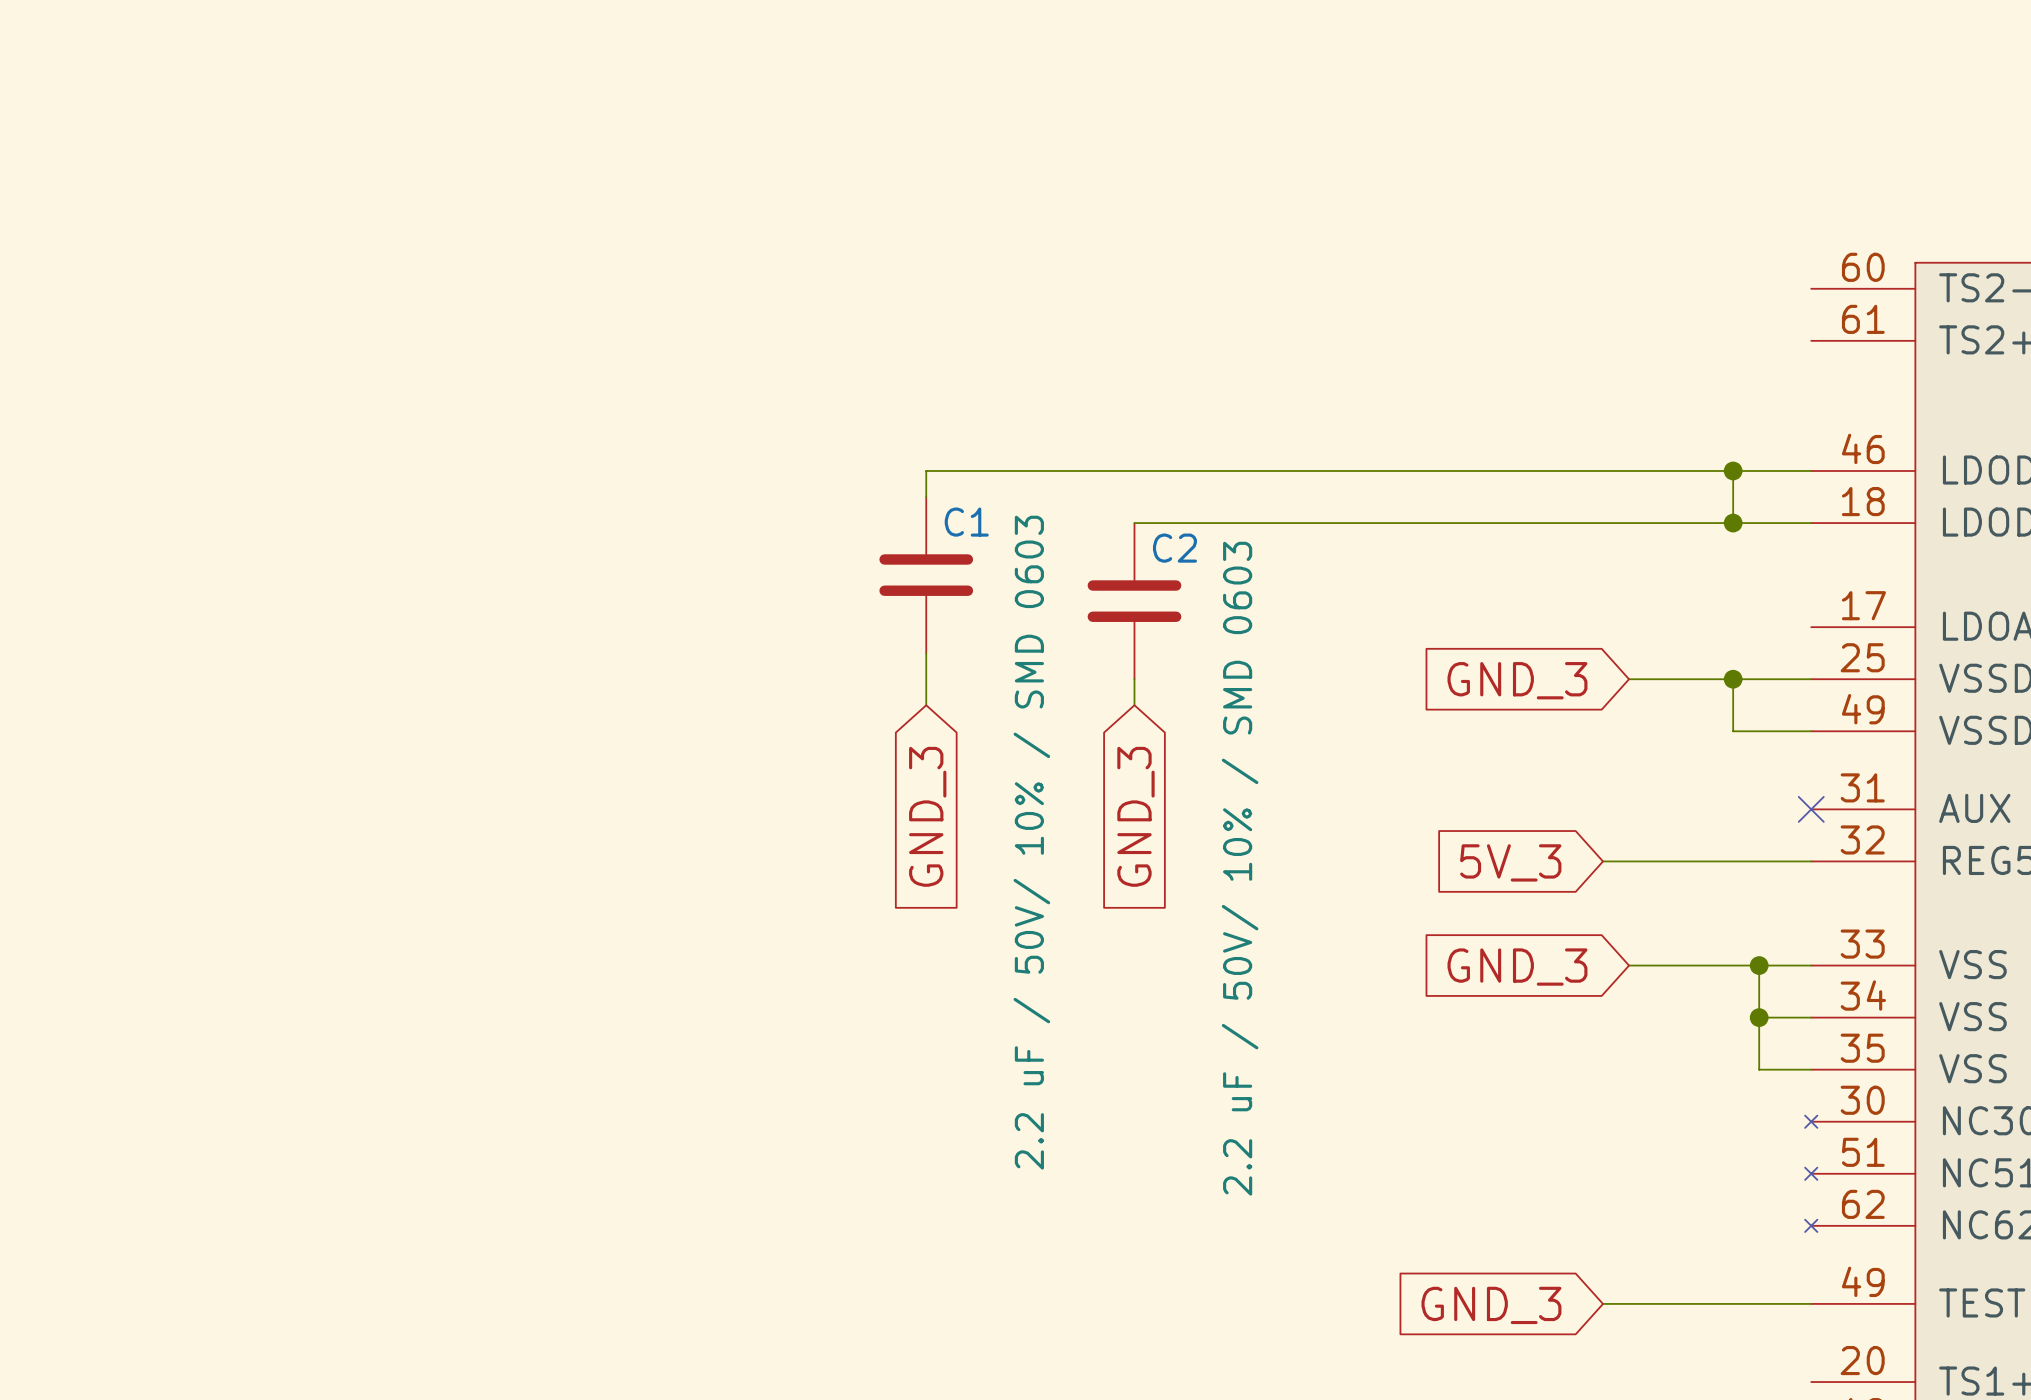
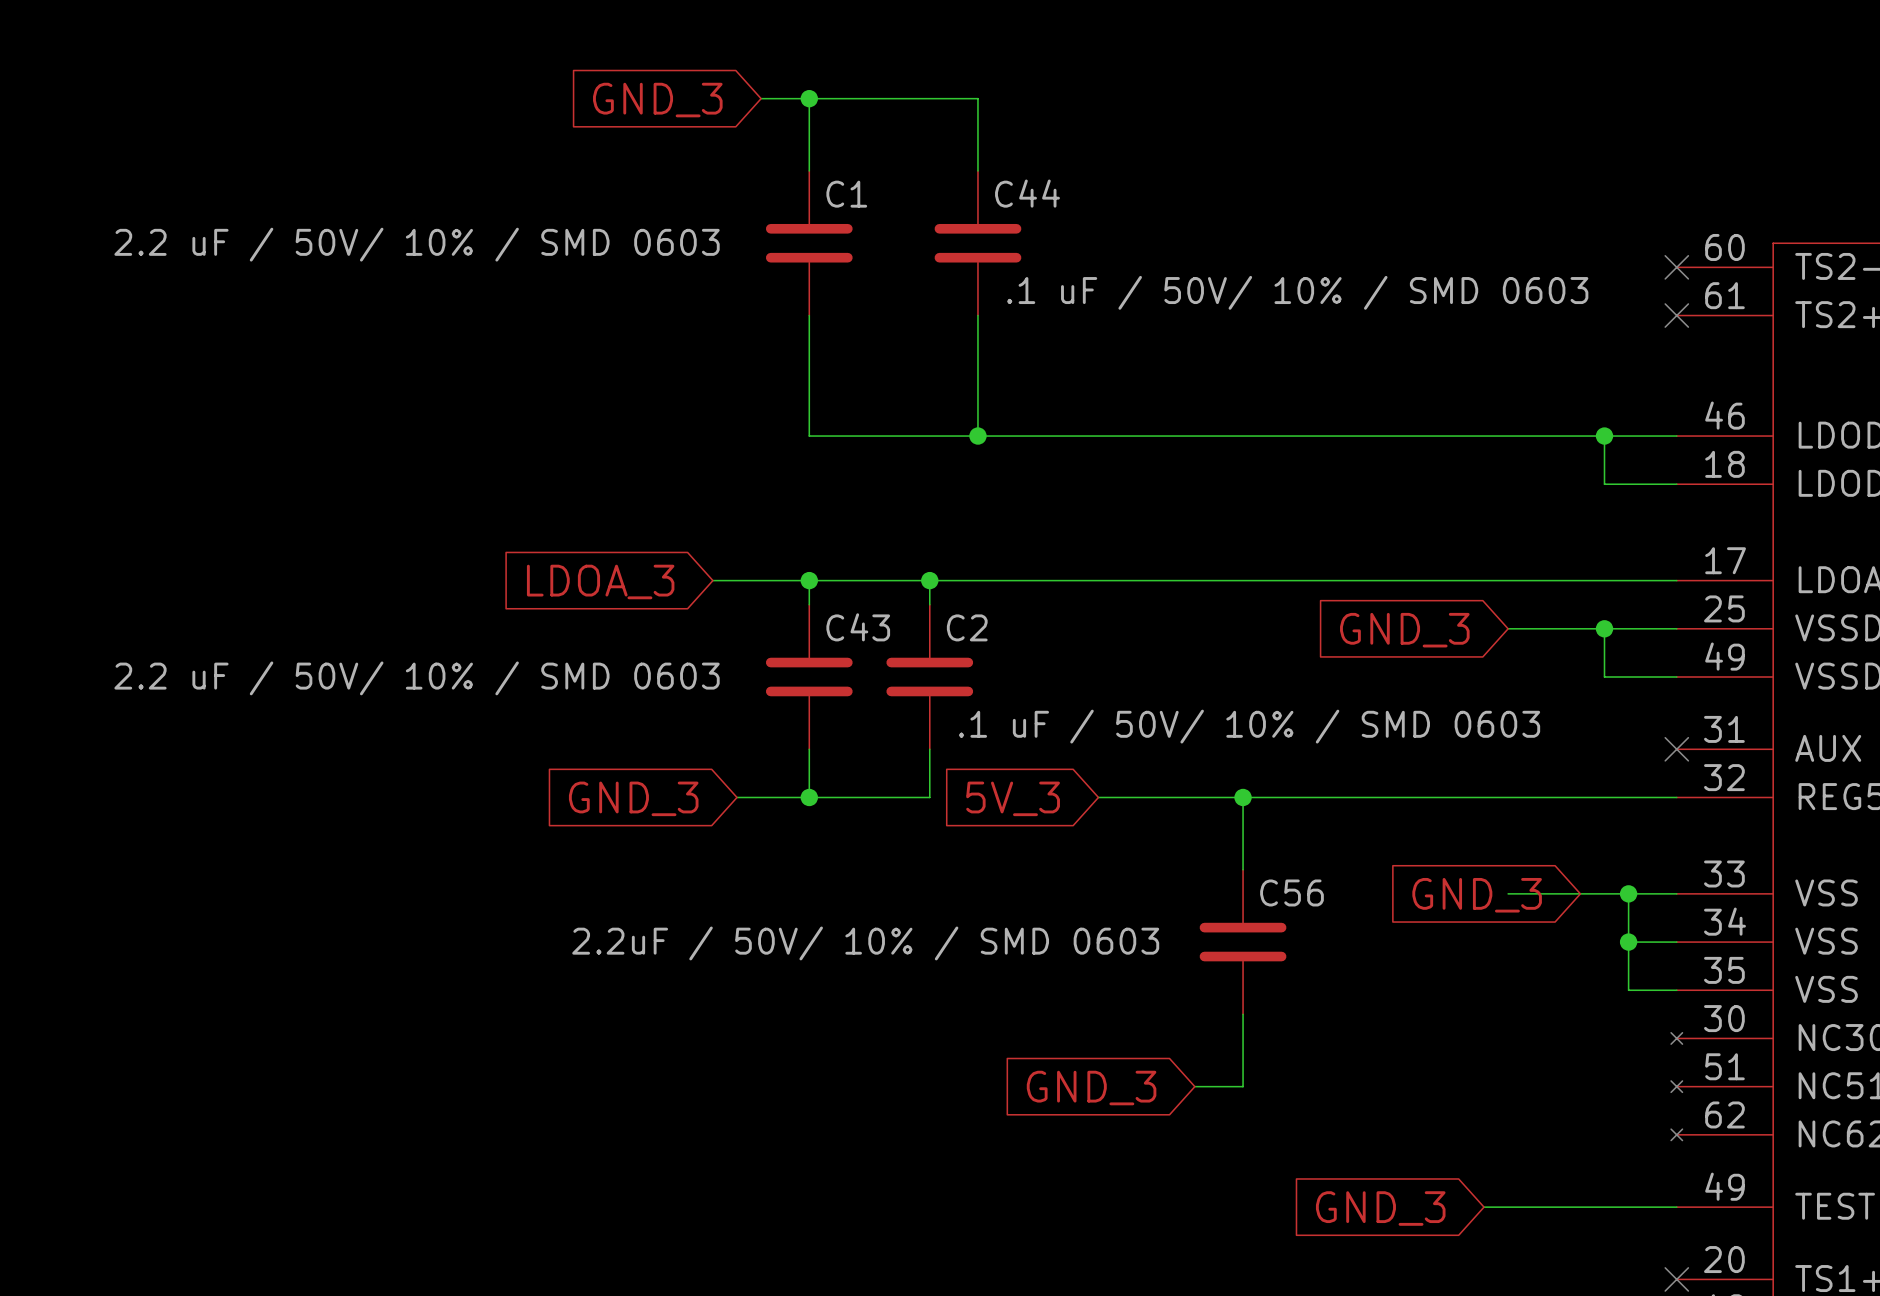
wire: none -> (761, 98) (977, 98) (977, 170)
wire: none -> (809, 98) (809, 170)
junction: none -> (809, 98)
global label: none -> GND_3 (657, 100)
C44: none -> .1 uF / 50V/ 10% / SMD 0603 (977, 243)
no-connect mark: none -> (1676, 267)
wire: none -> (977, 315) (977, 436)
no-connect mark: none -> (1676, 315)
wire: (926, 470) (926, 497) -> (857, 436) (809, 436) (809, 315)
junction: none -> (977, 436)
wire: (1134, 523) (1733, 523) -> none
junction: (1733, 523) -> none
C1 position: (926, 575) -> (809, 243)
C2 position: (1134, 601) -> (929, 677)
wire: none -> (712, 580) (1676, 580)
wire: none -> (809, 580) (809, 604)
junction: none -> (809, 580)
junction: none -> (929, 580)
global label: none -> LDOA_3 (600, 581)
wire: (926, 653) (926, 705) -> (809, 749) (809, 797)
wire: (1134, 679) (1134, 705) -> (929, 580) (929, 604)
C43: none -> 2.2 uF / 50V/ 10% / SMD 0603 (809, 677)
wire: none -> (929, 749) (929, 797) (737, 797)
global label: GND_3 (927, 816) -> none
global label: GND_3 (1135, 816) -> none
C1 value rotation: 0° (1031, 842) -> 90° clockwise (417, 244)
junction: none -> (809, 797)
wire: none -> (1098, 797) (1484, 797)
wire: none -> (1243, 797) (1243, 869)
junction: none -> (1243, 797)
global label: none -> GND_3 (633, 798)
global label position: 5V_3 (1510, 862) -> 5V_3 (1013, 798)
C2 value: 2.2 uF / 50V/ 10% / SMD 0603 (1240, 868) -> .1 uF / 50V/ 10% / SMD 0603 (1249, 726)
global label position: GND_3 (1517, 967) -> GND_3 (1477, 895)
C56: none -> 2.2uF / 50V/ 10% / SMD 0603 (1243, 942)
wire: none -> (1243, 1014) (1243, 1086) (1194, 1086)
global label: none -> GND_3 (1091, 1088)
no-connect mark: none -> (1676, 1279)

